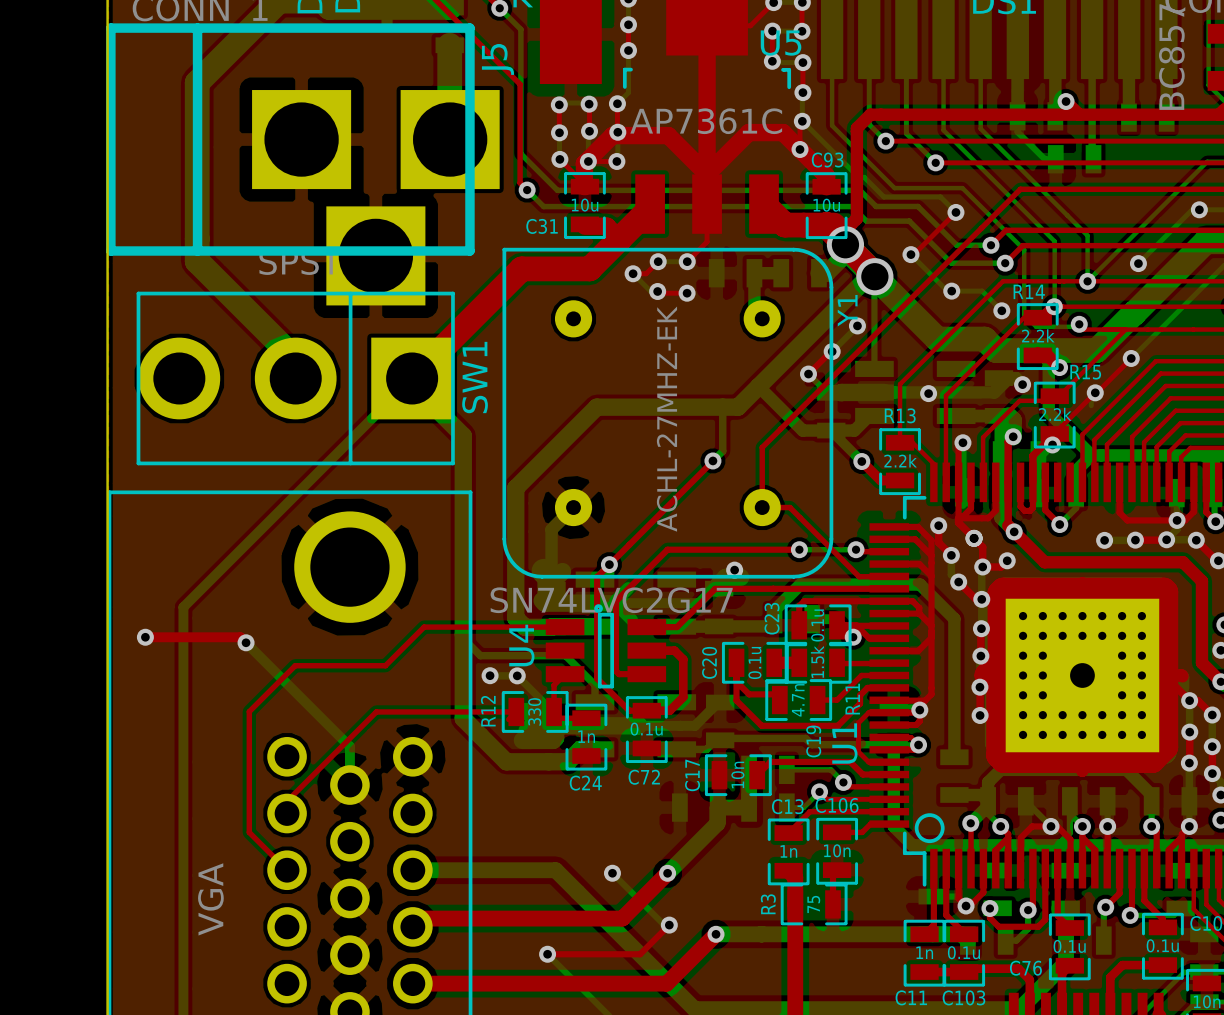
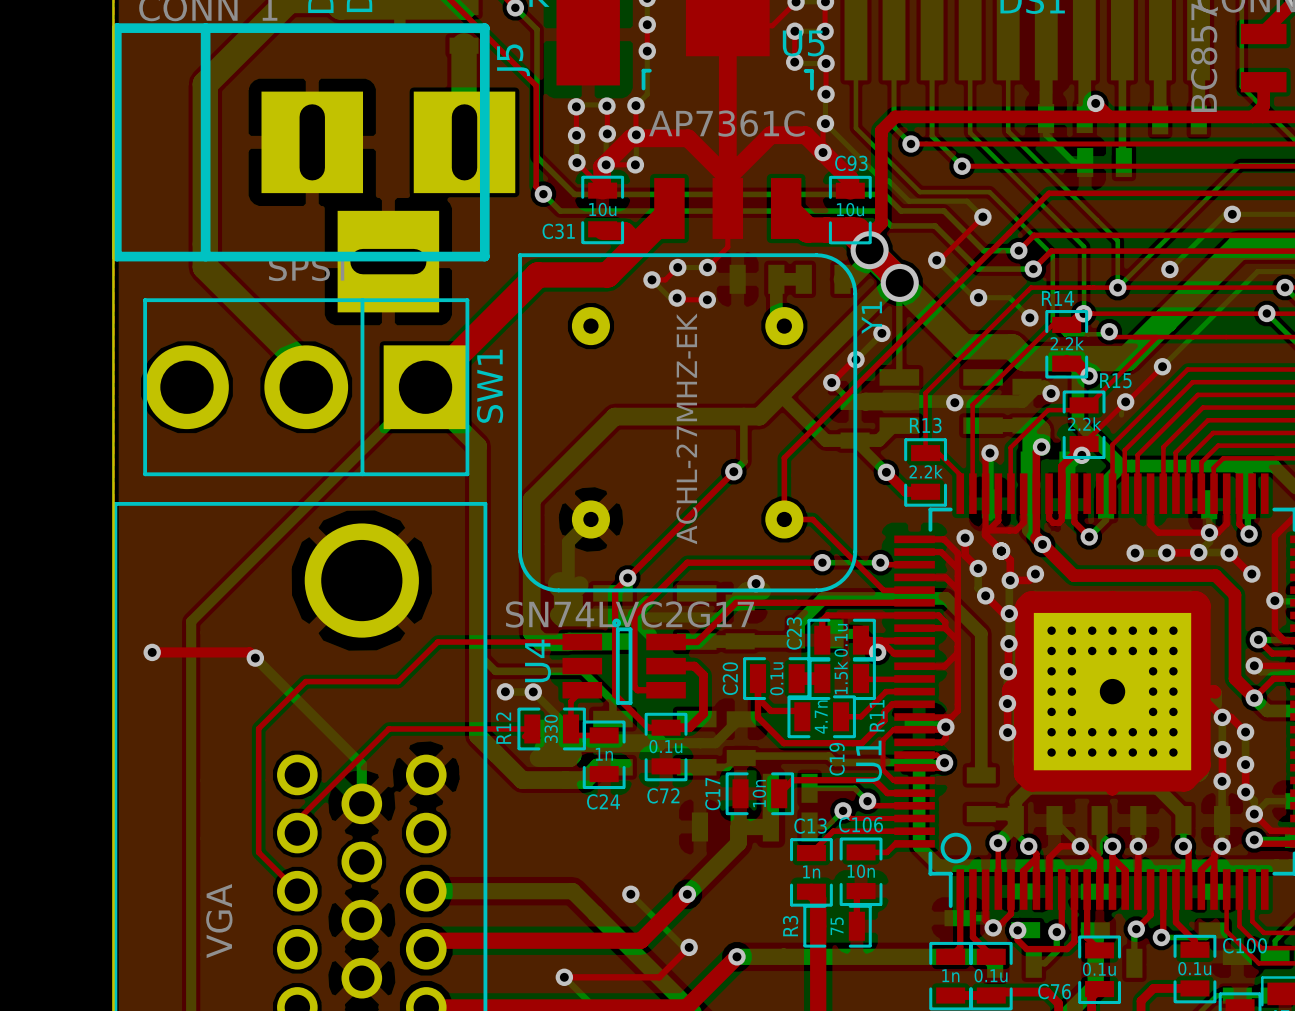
J5 footprint: [106, 23, 500, 306] -> [111, 23, 516, 313]

